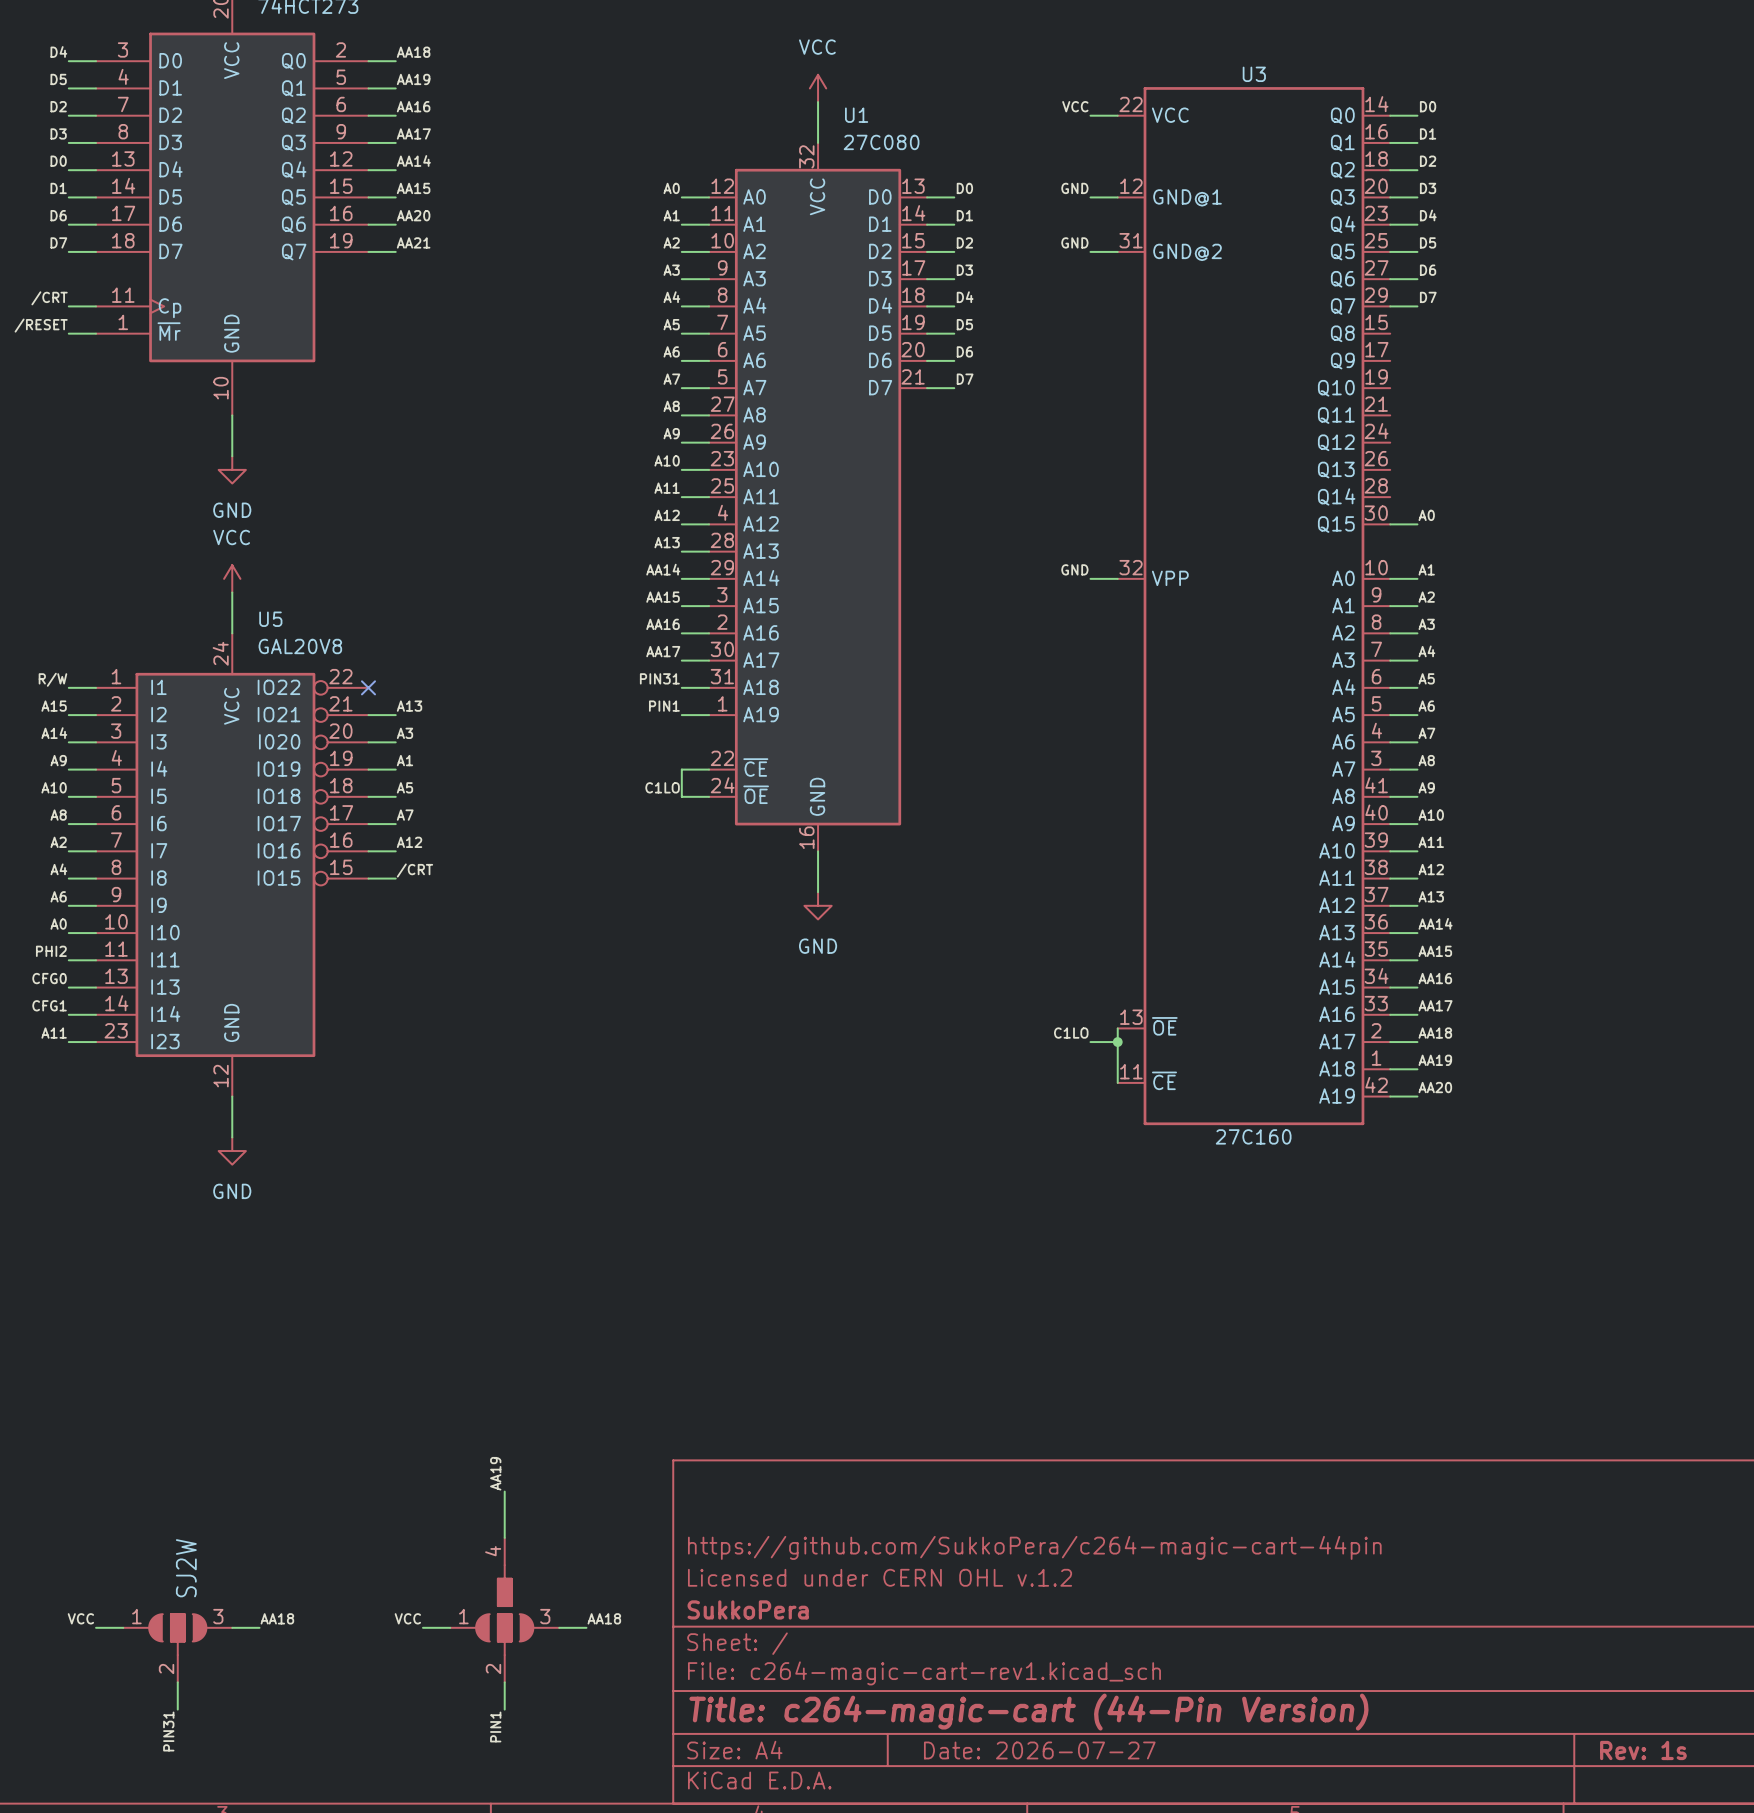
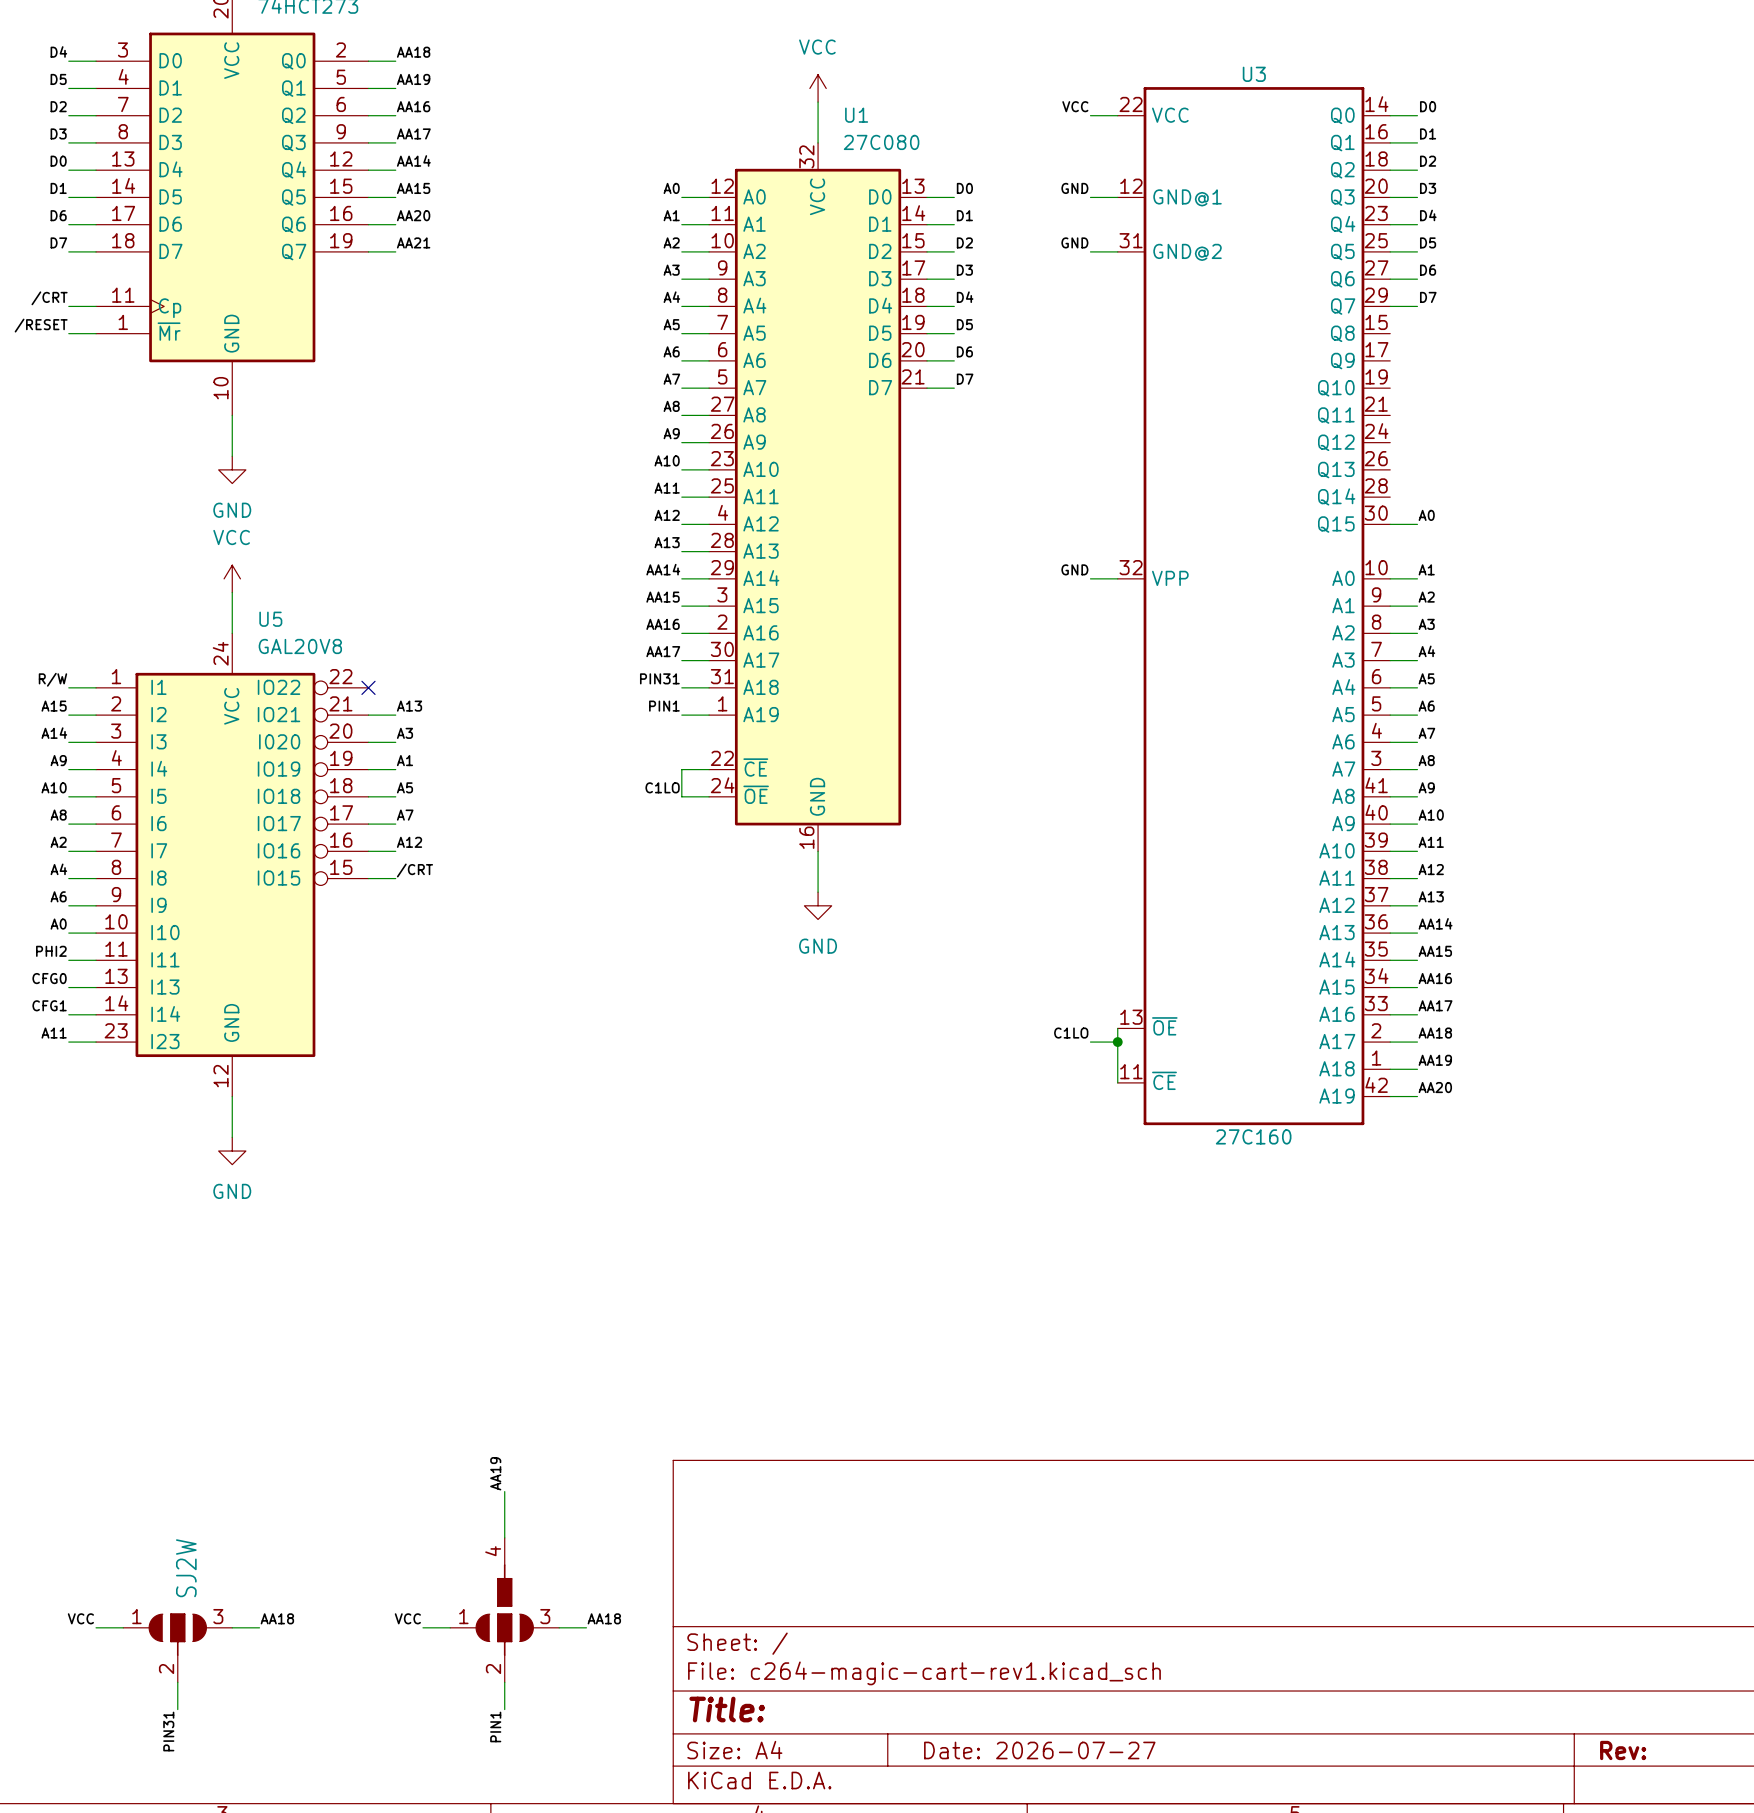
title block: https://github.com/SukkoPera/c264-magic-cart-44pin (1034, 1547) -> none
title block: Licensed under CERN OHL v.1.2 (880, 1577) -> none
title block: SukkoPera (748, 1609) -> none
title block: Title: c264-magic-cart (44-Pin Version) (1028, 1712) -> Title: (727, 1709)
title block: Rev: 1s (1643, 1750) -> Rev: (1623, 1750)

